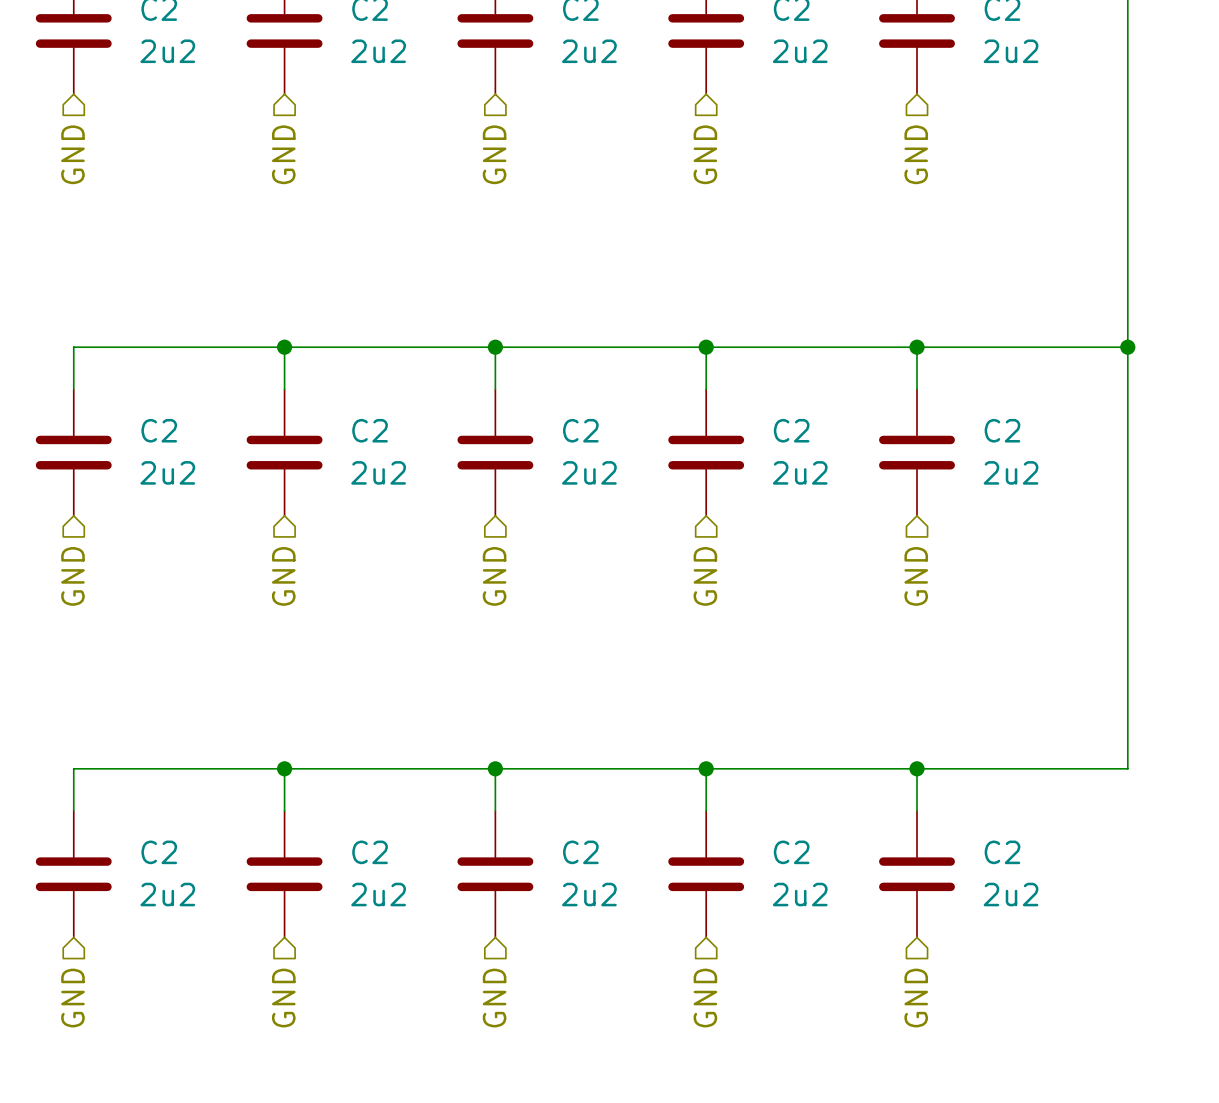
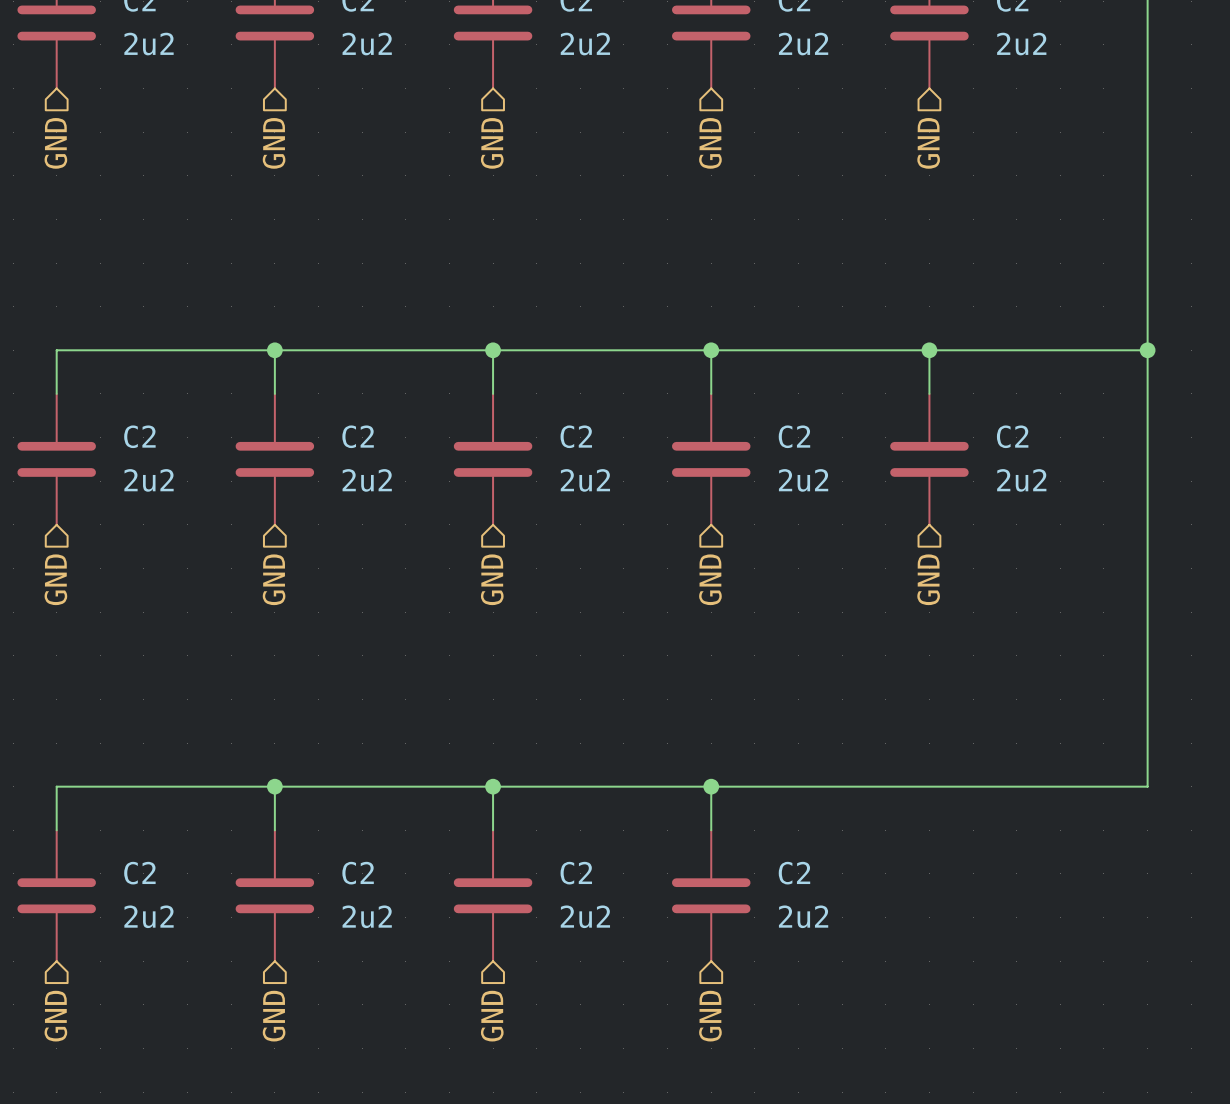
wire: (917, 768) (917, 810) -> none
junction: (917, 768) -> none
C2: 2u2 (917, 874) -> none
hierarchical label: GND (916, 998) -> none

